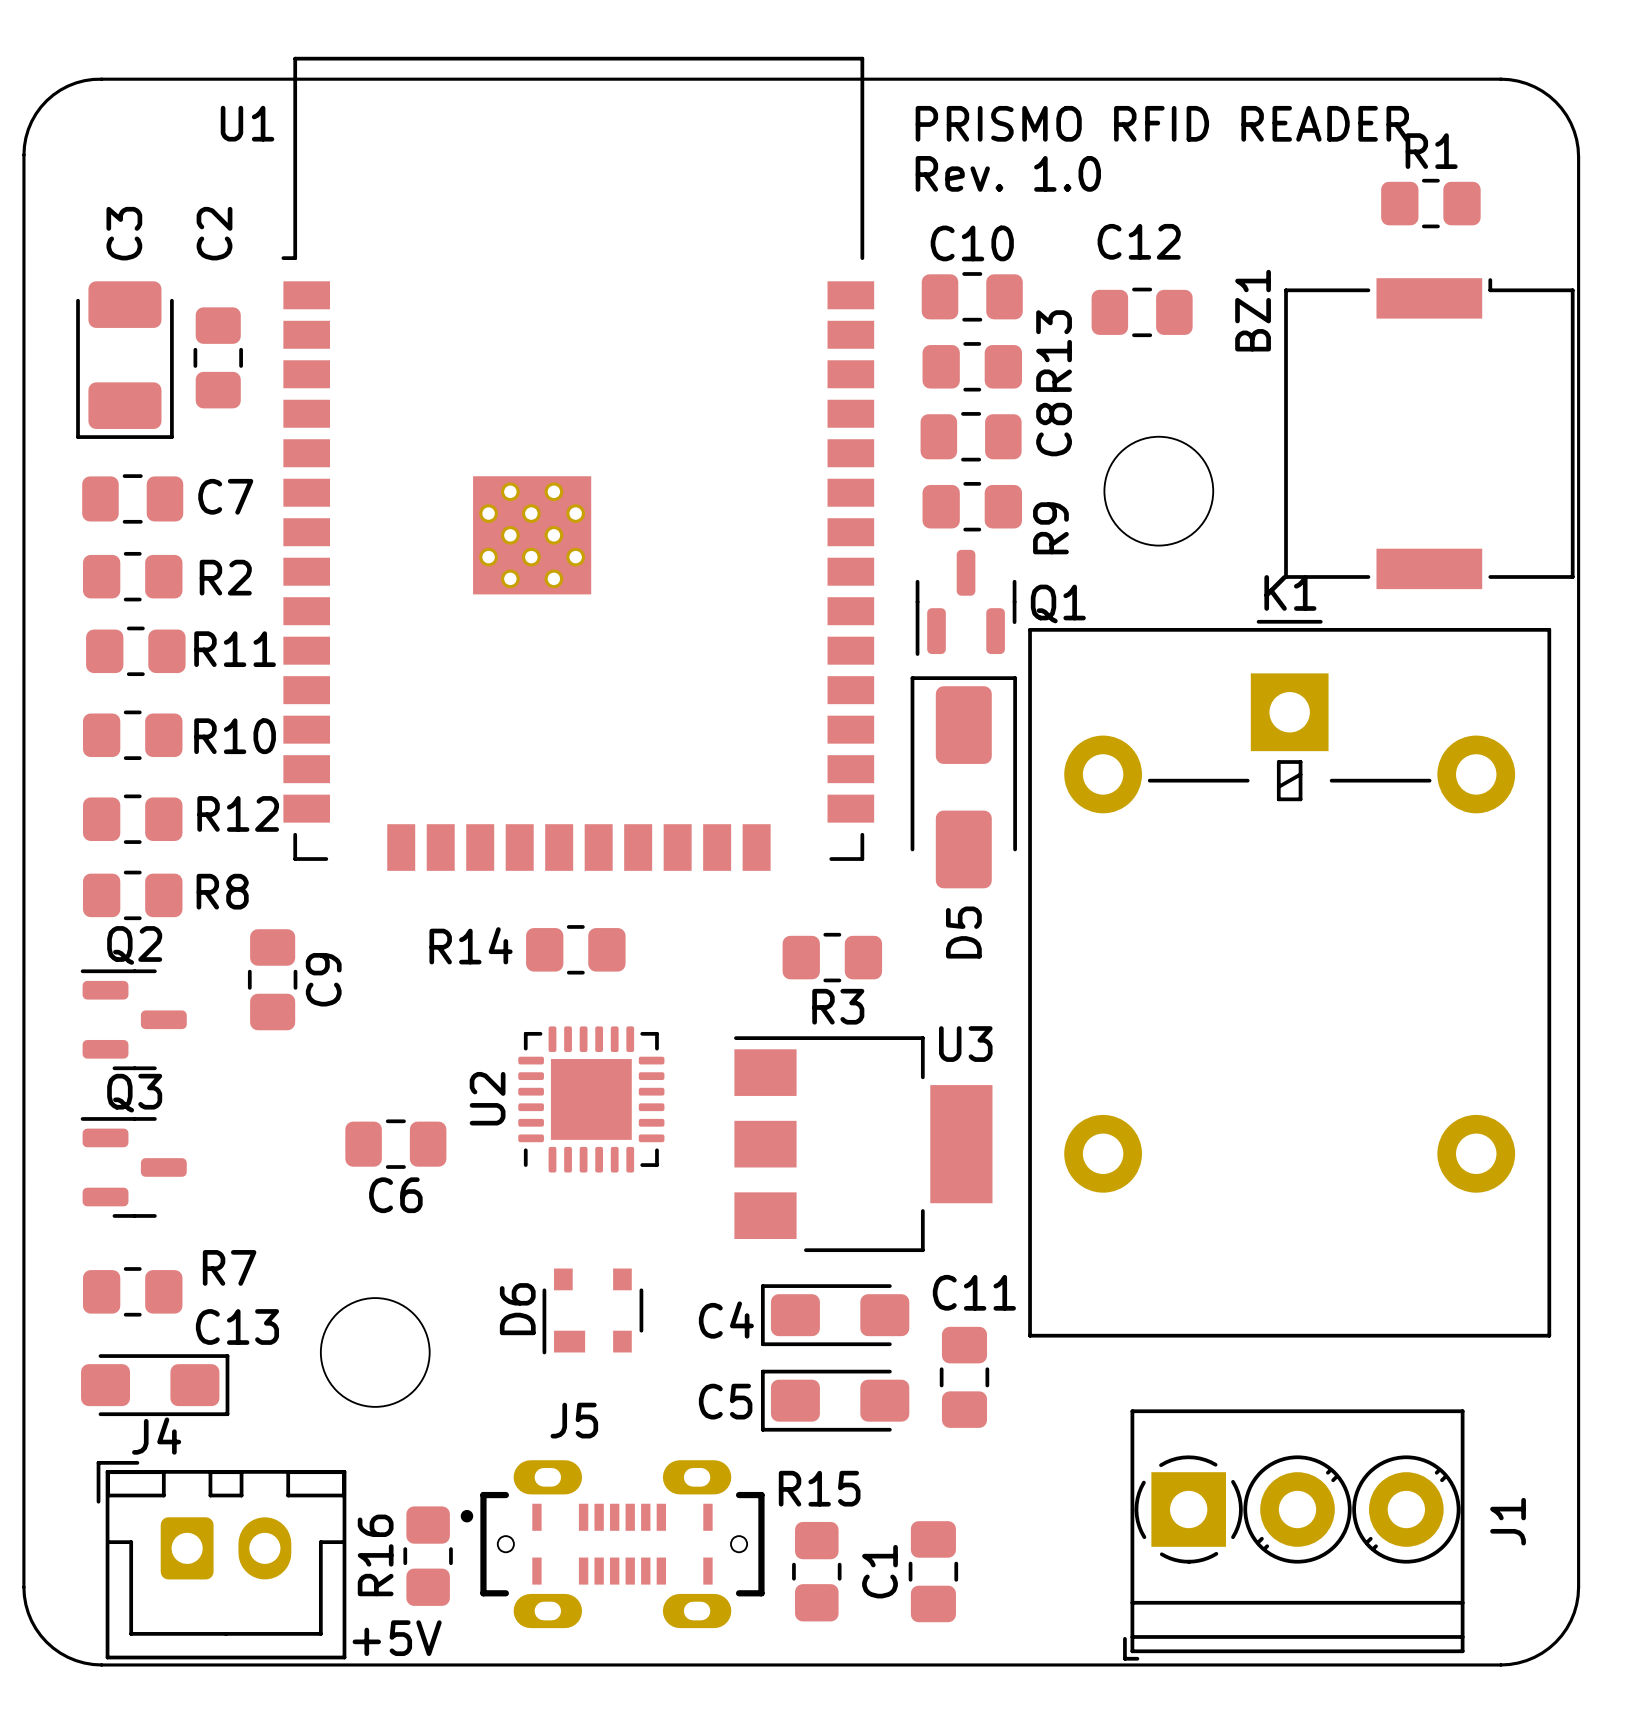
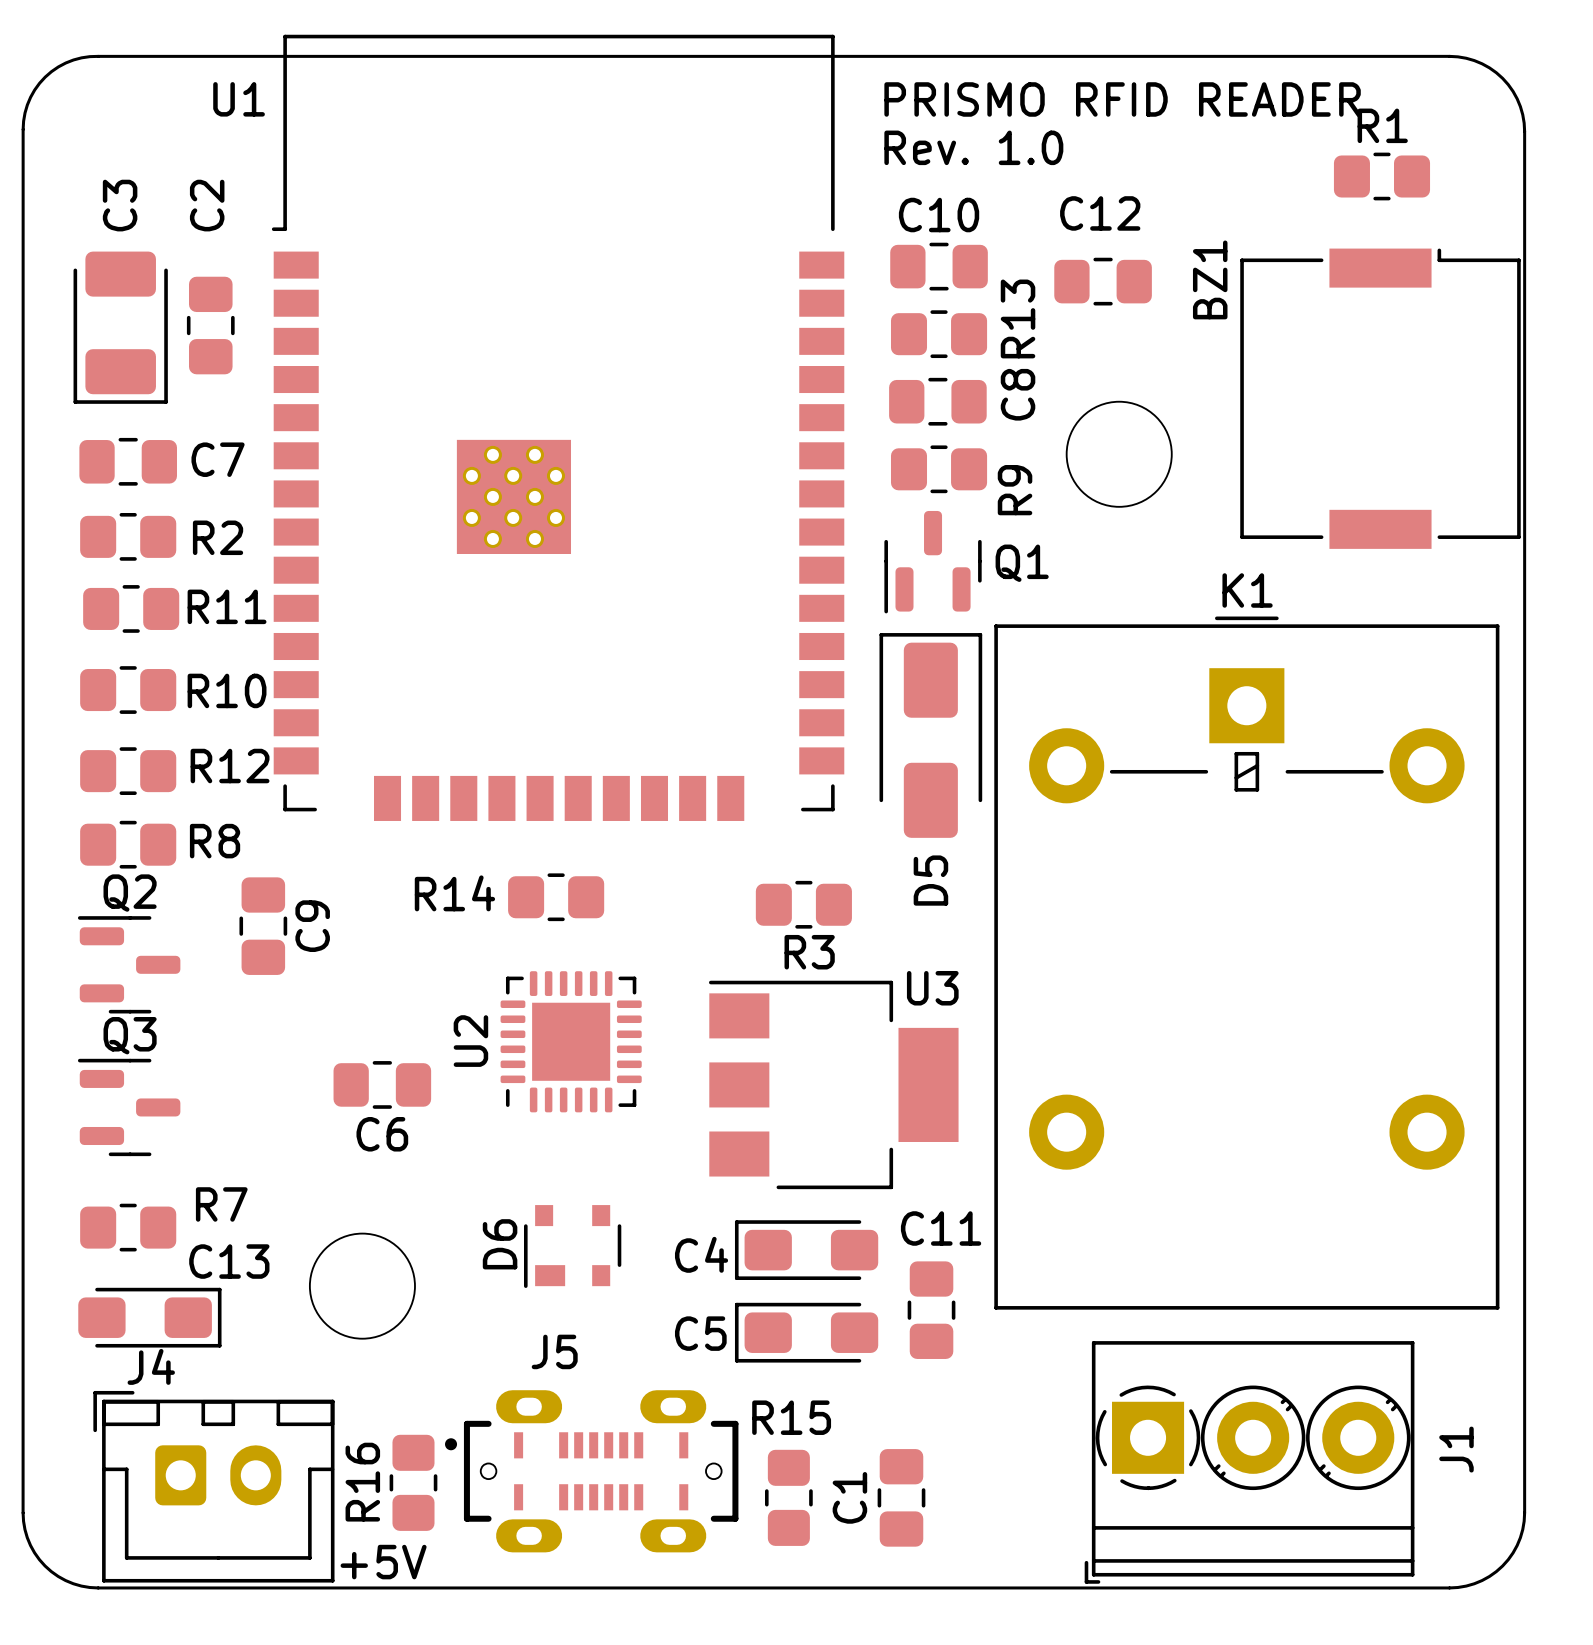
K1 position: (1289, 978) -> (1246, 963)

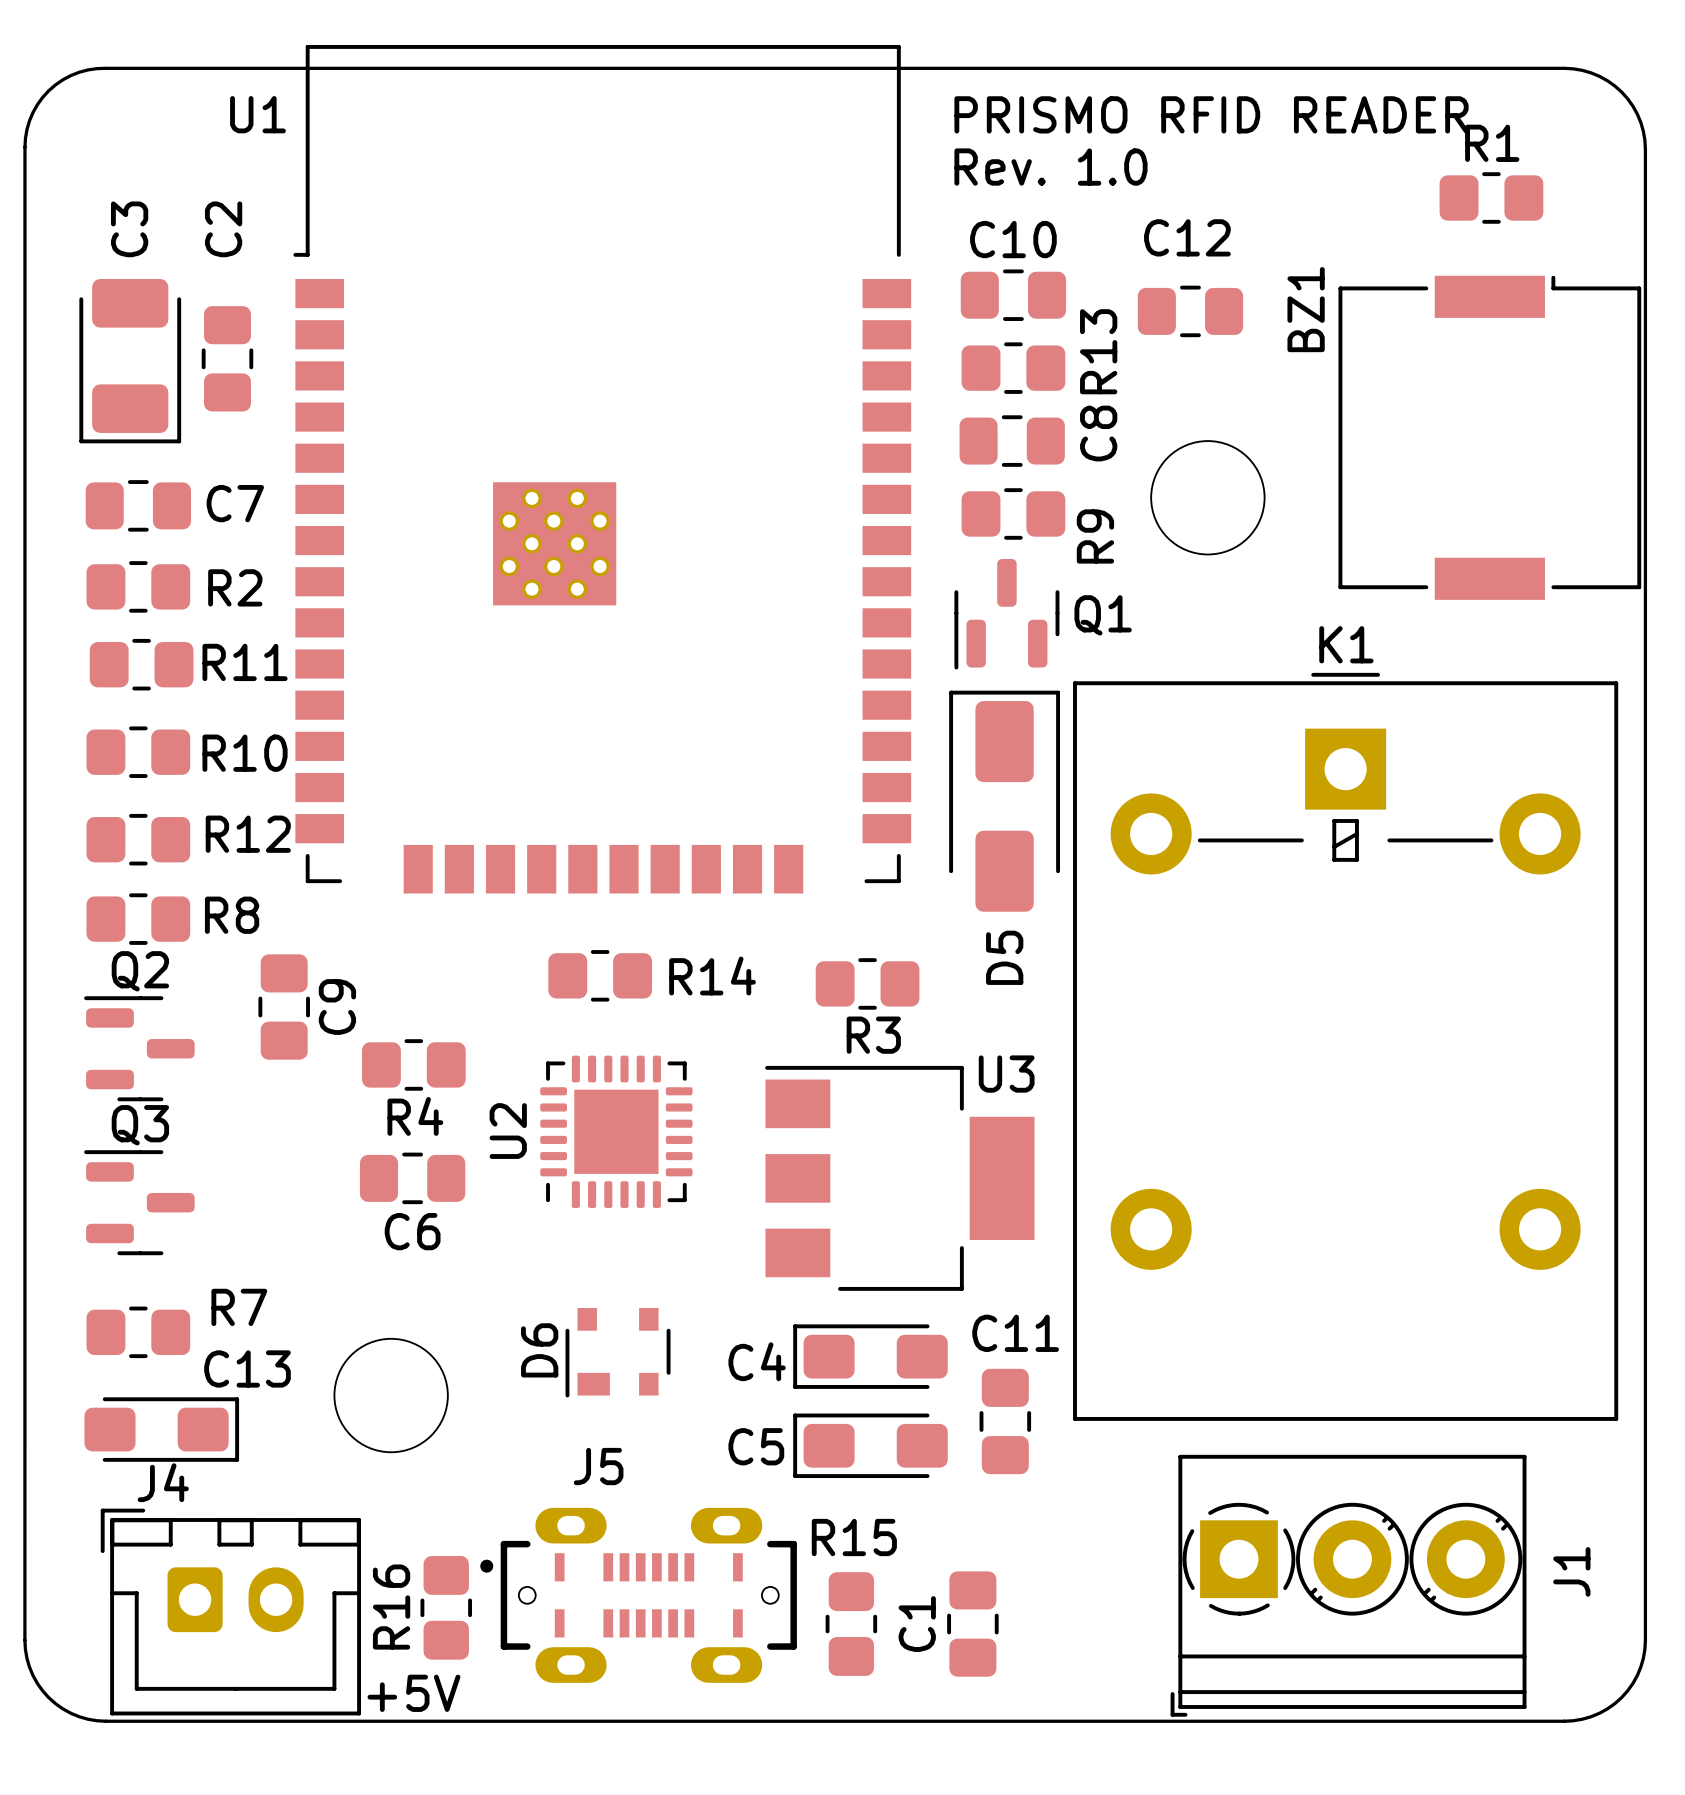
R14 name position: R14 (454, 893) -> R14 (712, 976)
R4: none -> (413, 1064)

